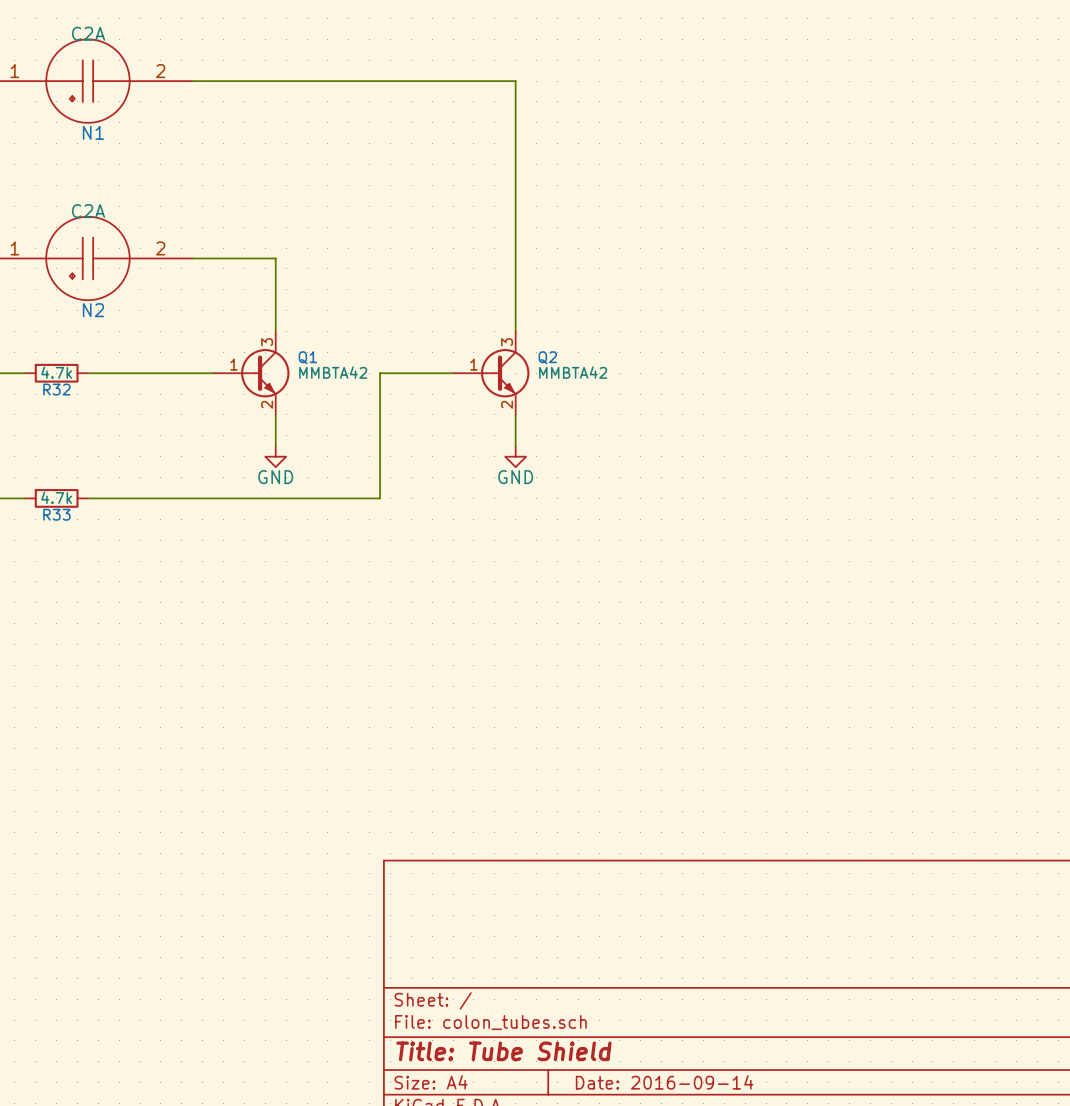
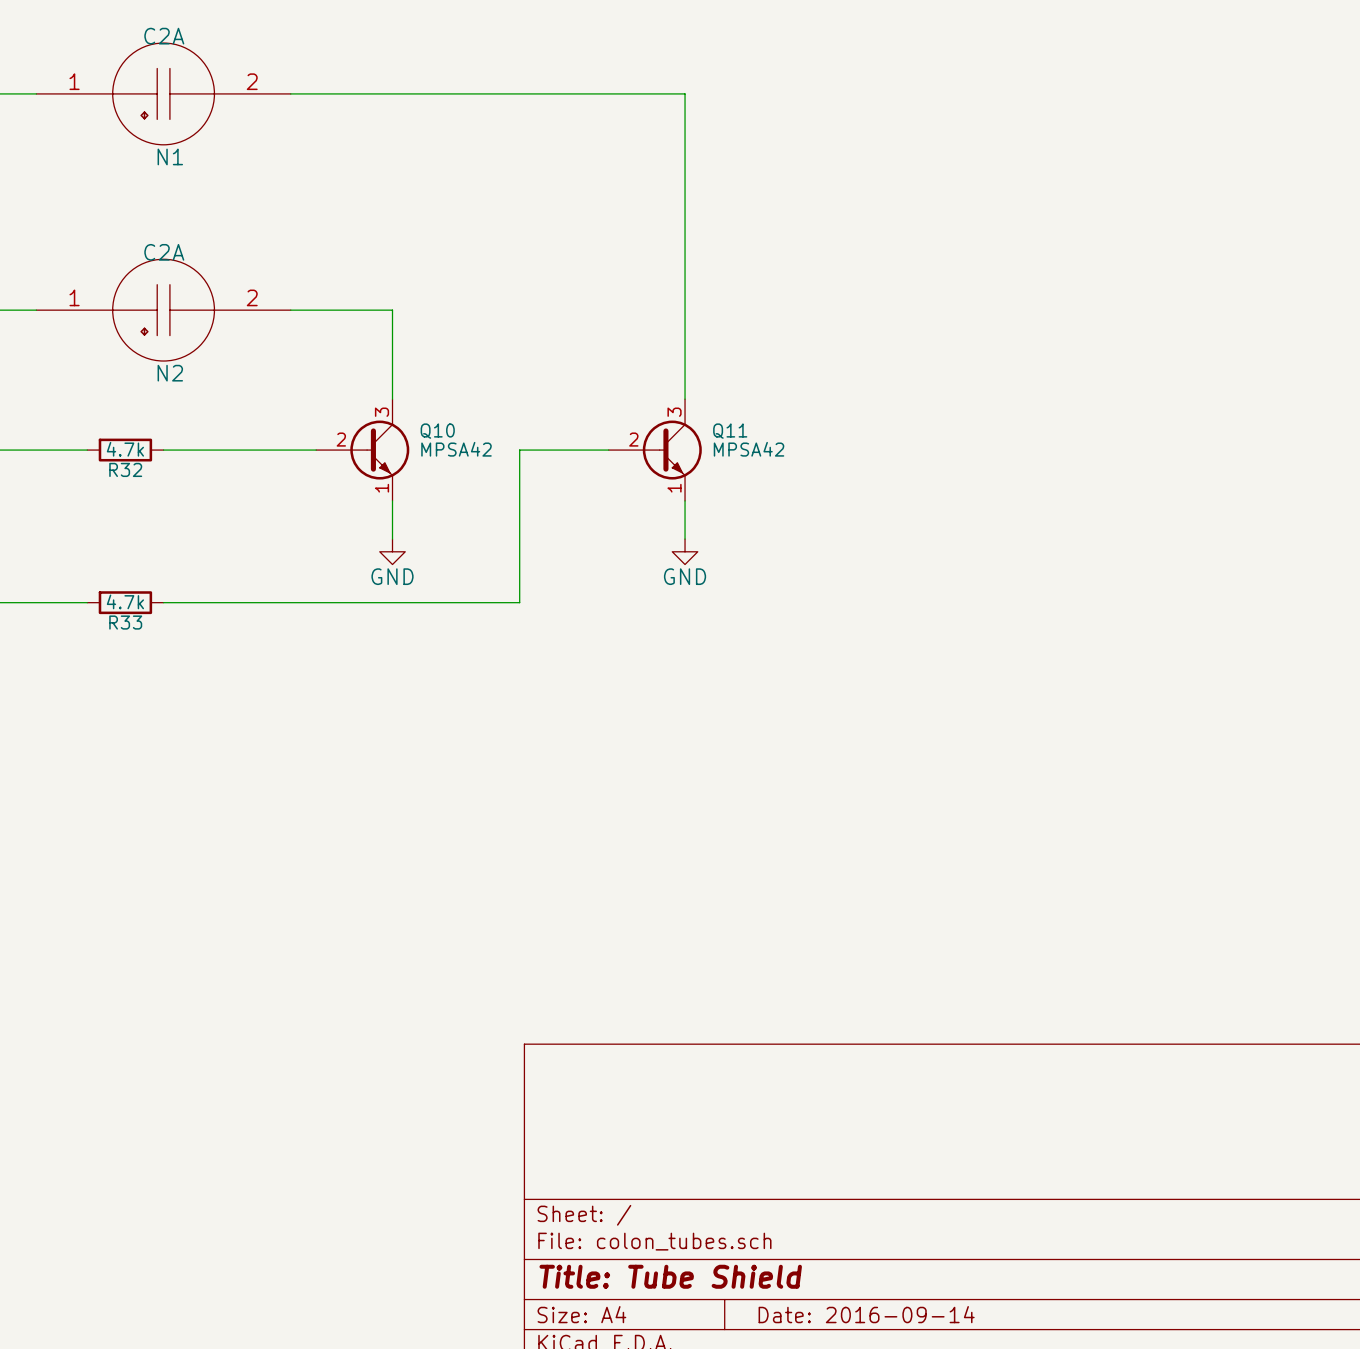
Q1 name: Q1 (307, 357) -> Q10 (437, 431)
Q2 name: Q2 (547, 357) -> Q11 (730, 431)
Q1 pin number: 1 (234, 364) -> 2 (341, 439)
Q2 pin number: 1 (473, 364) -> 2 (633, 439)
Q1 value: MMBTA42 (333, 372) -> MPSA42 (456, 449)
Q2 value: MMBTA42 (573, 372) -> MPSA42 (749, 449)
Q1 pin number: 2 (267, 404) -> 1 (382, 488)
Q2 pin number: 2 (507, 404) -> 1 (674, 488)

